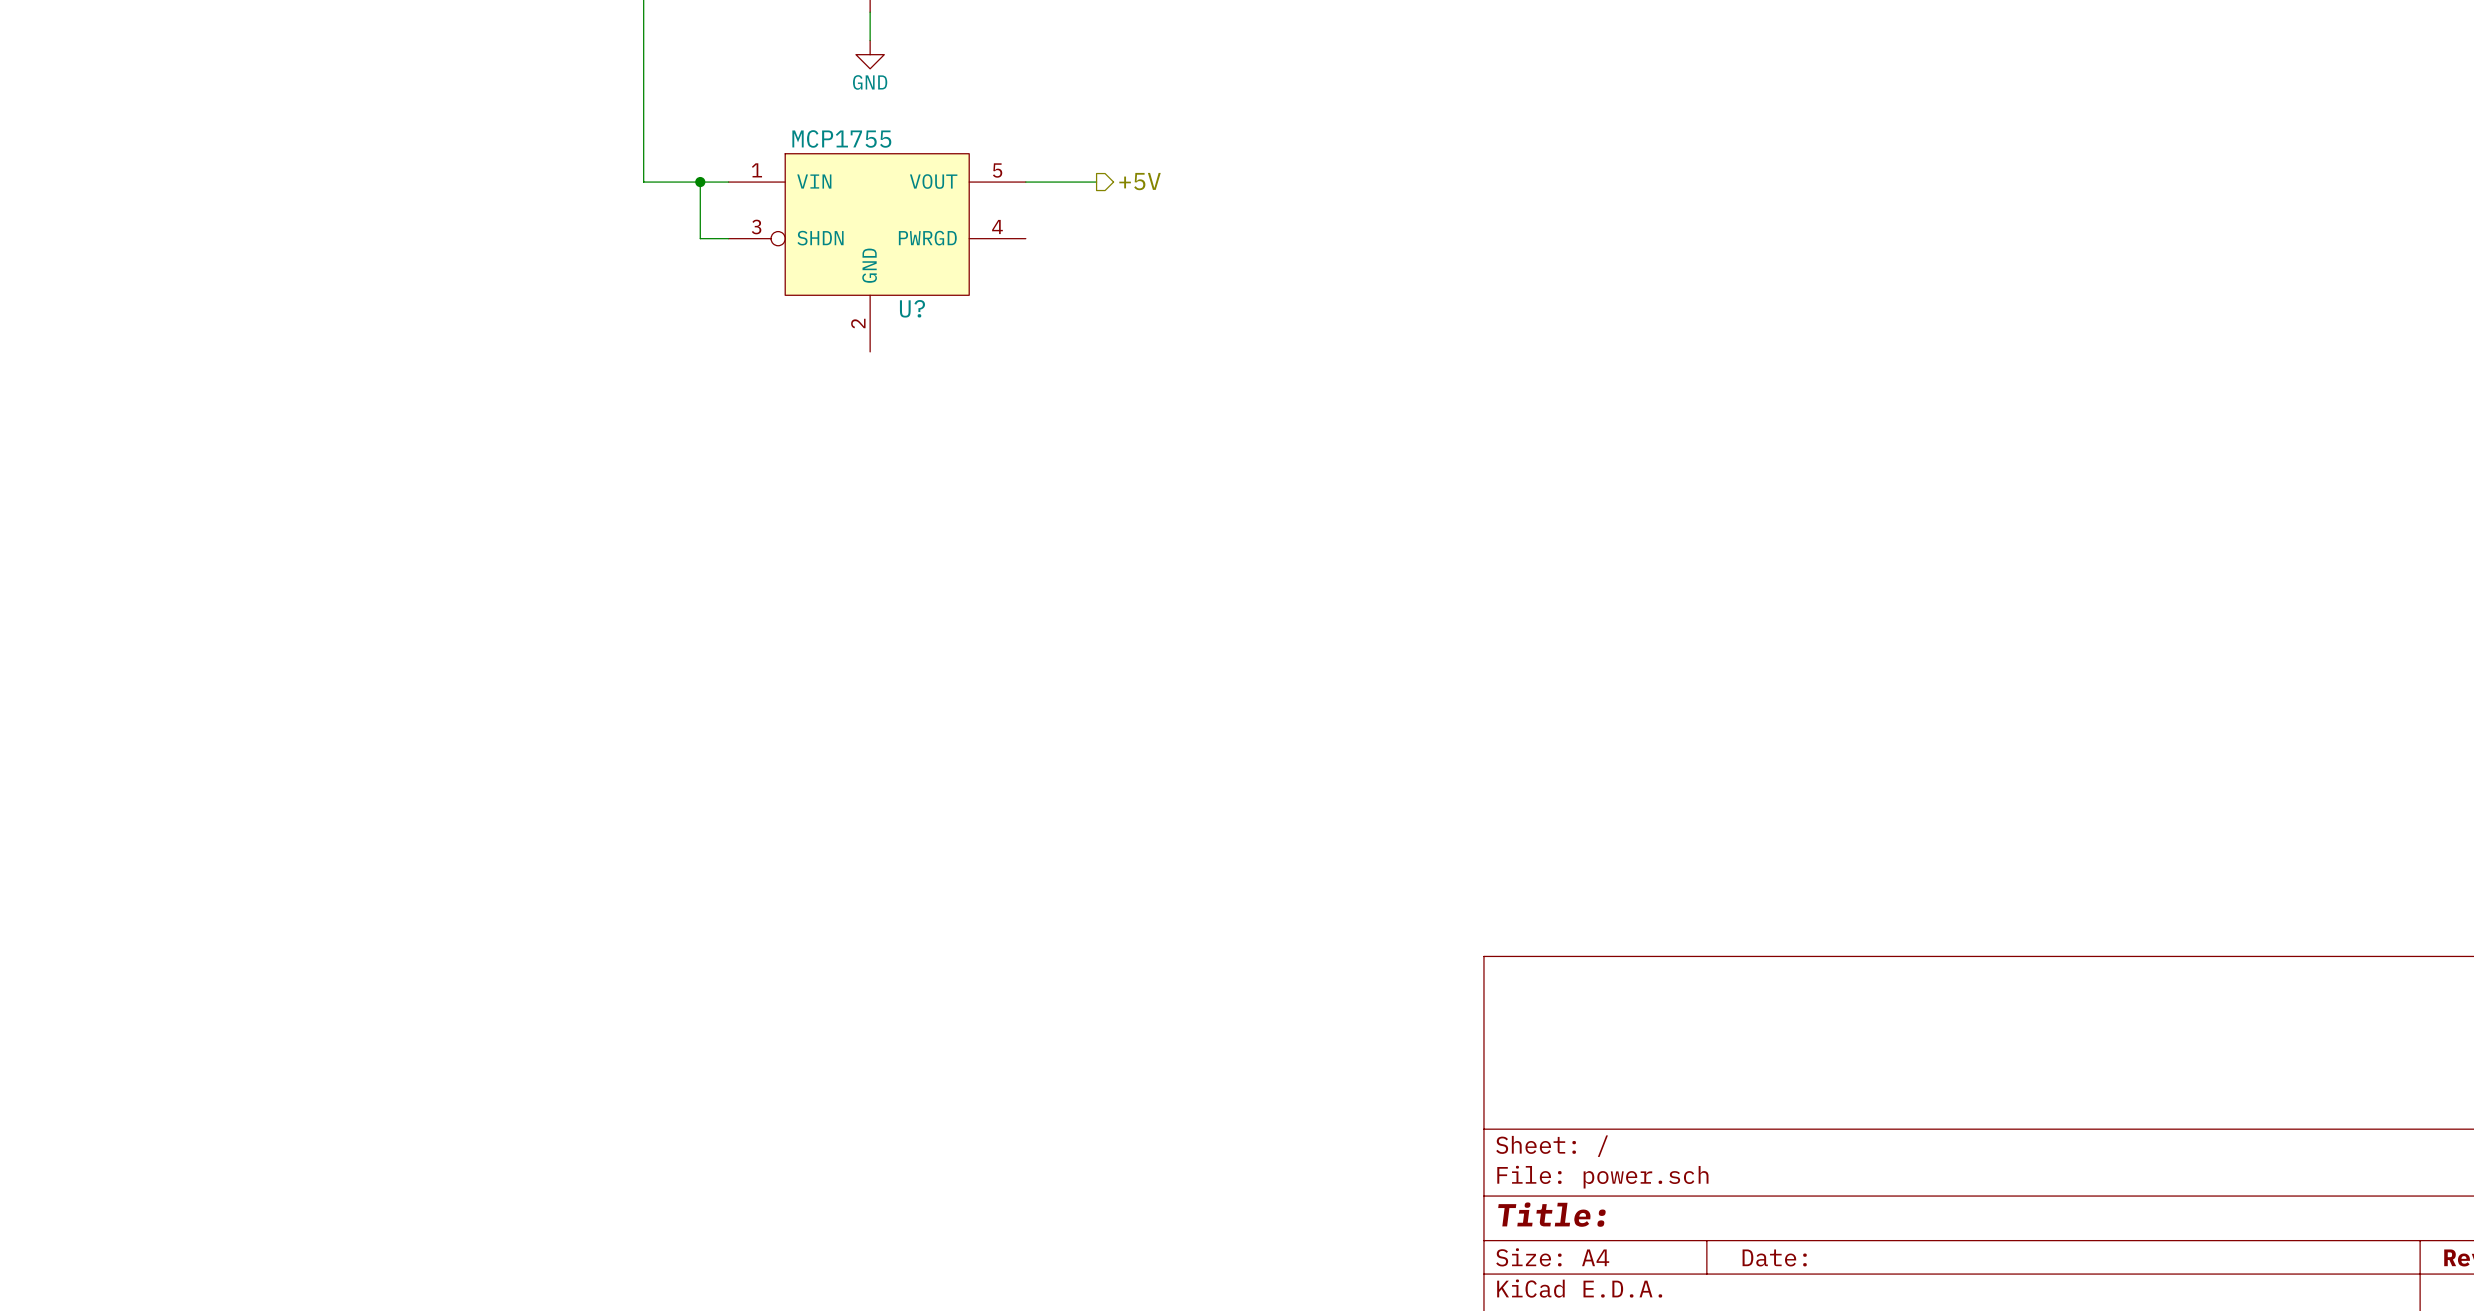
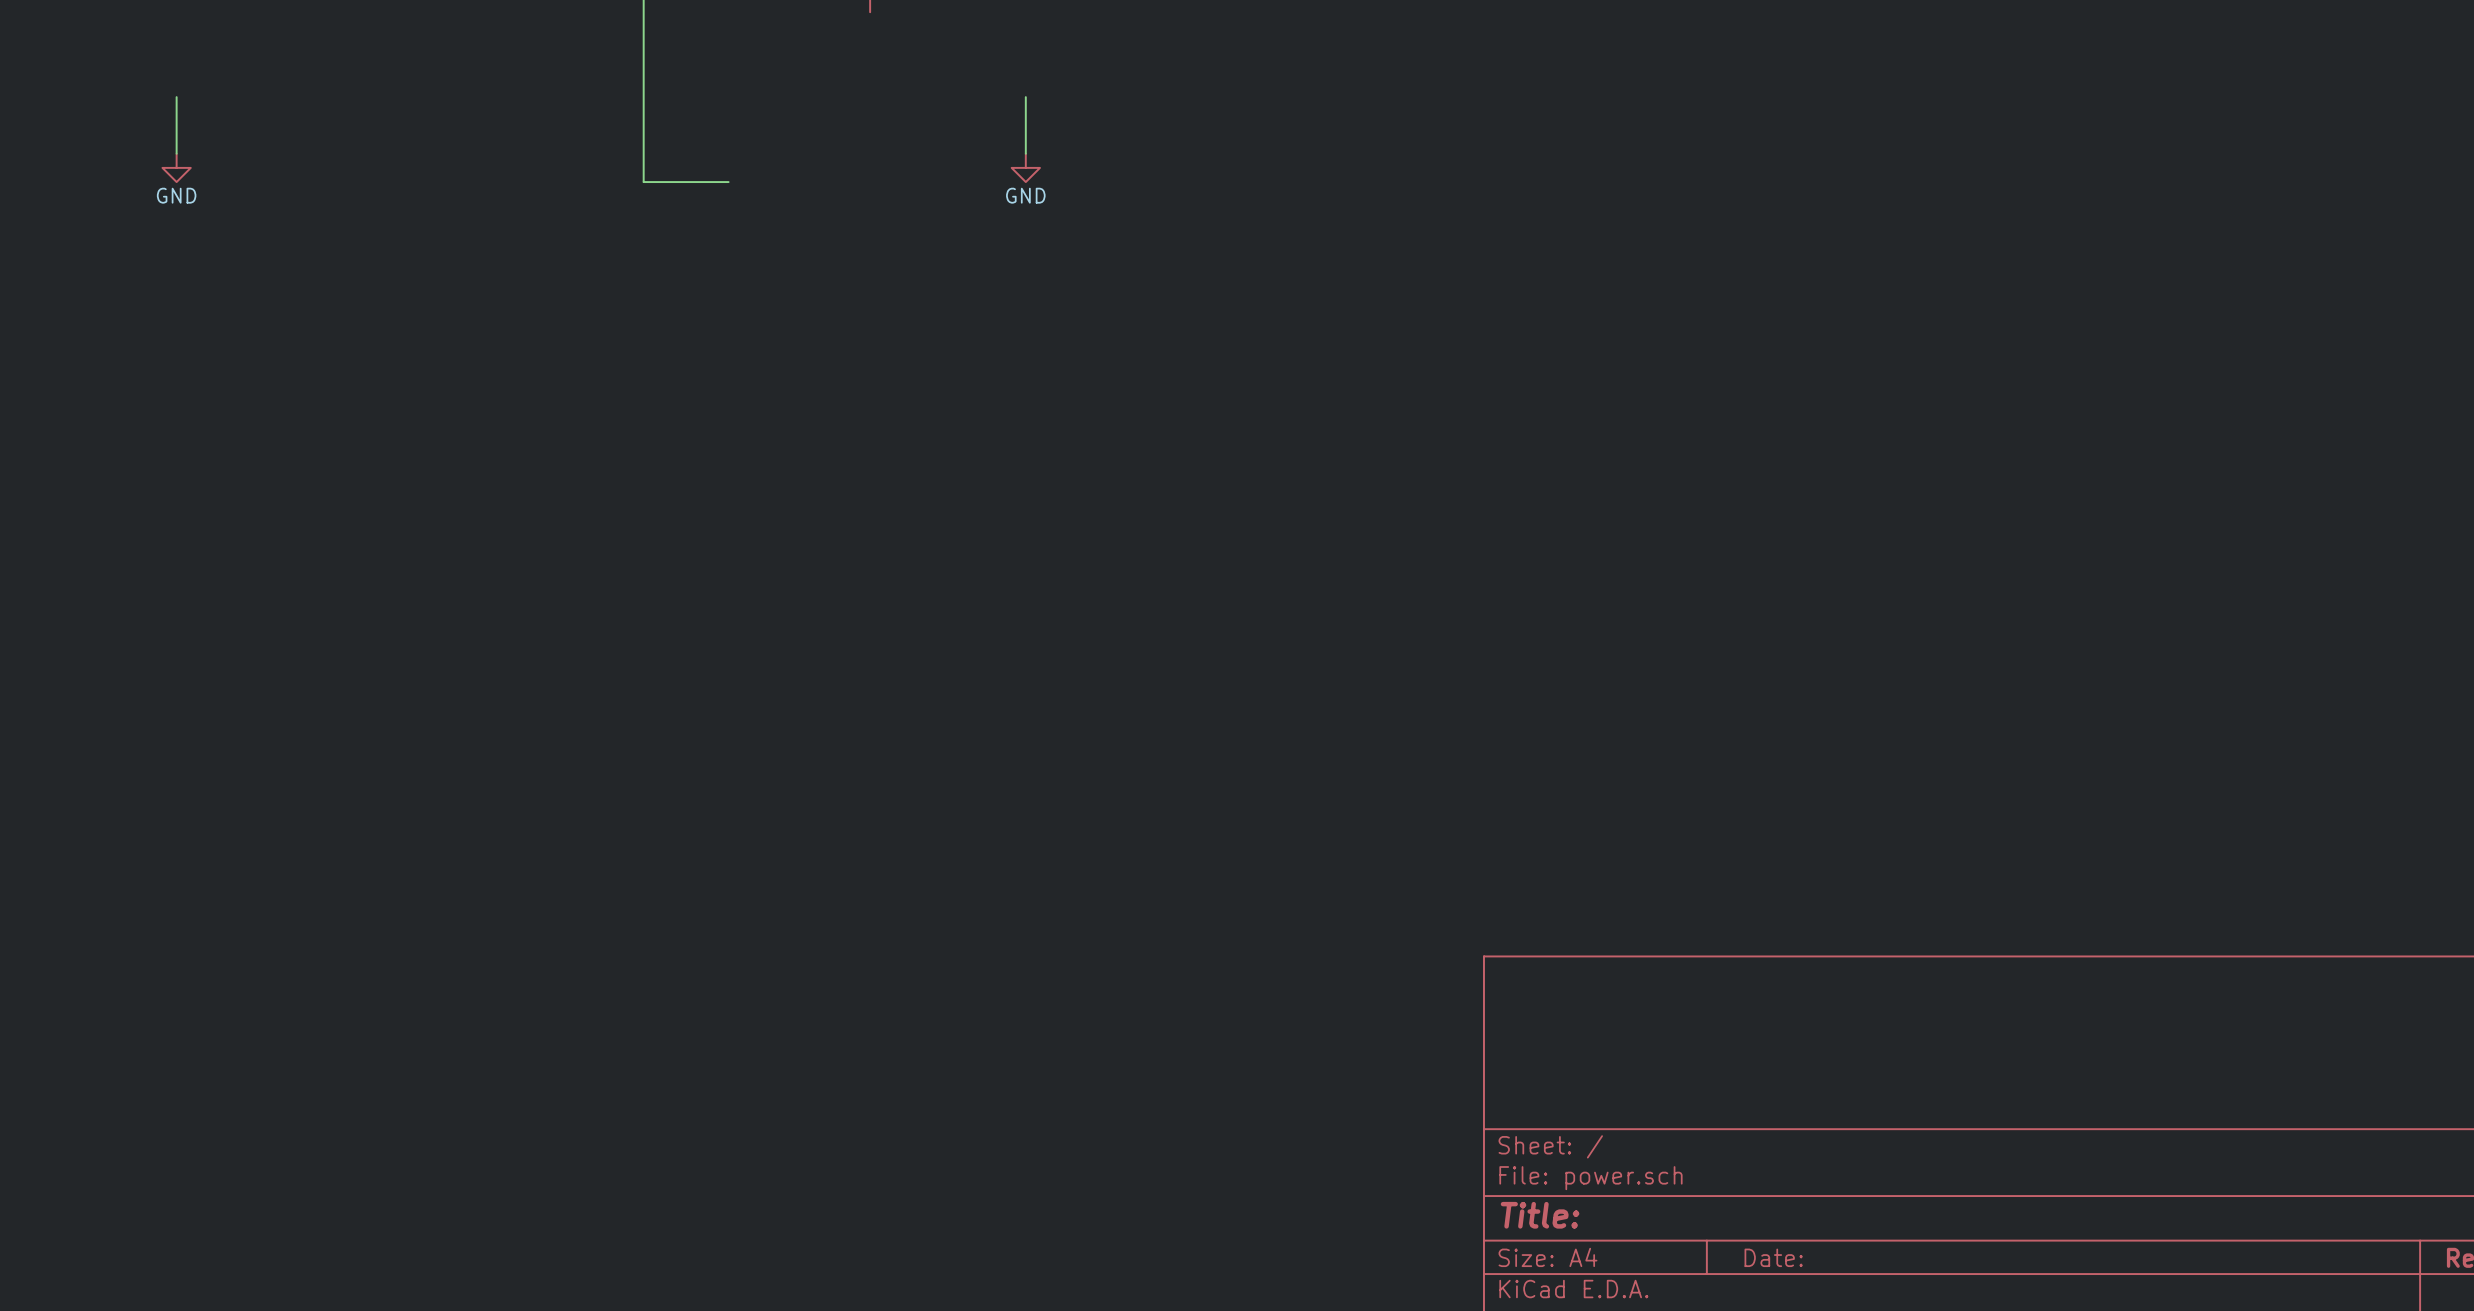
wire: (870, 12) (870, 40) -> none
power symbol position: GND (870, 54) -> GND (1025, 167)
wire: none -> (176, 97) (176, 153)
wire: none -> (1025, 97) (1025, 153)
power symbol: none -> GND (176, 167)
hierarchical label: +5V (1140, 181) -> none
wire: (700, 182) (700, 238) (728, 238) -> none
junction: (700, 182) -> none
wire: (1025, 182) (1096, 182) -> none
U?: MCP1755 (877, 252) -> none

